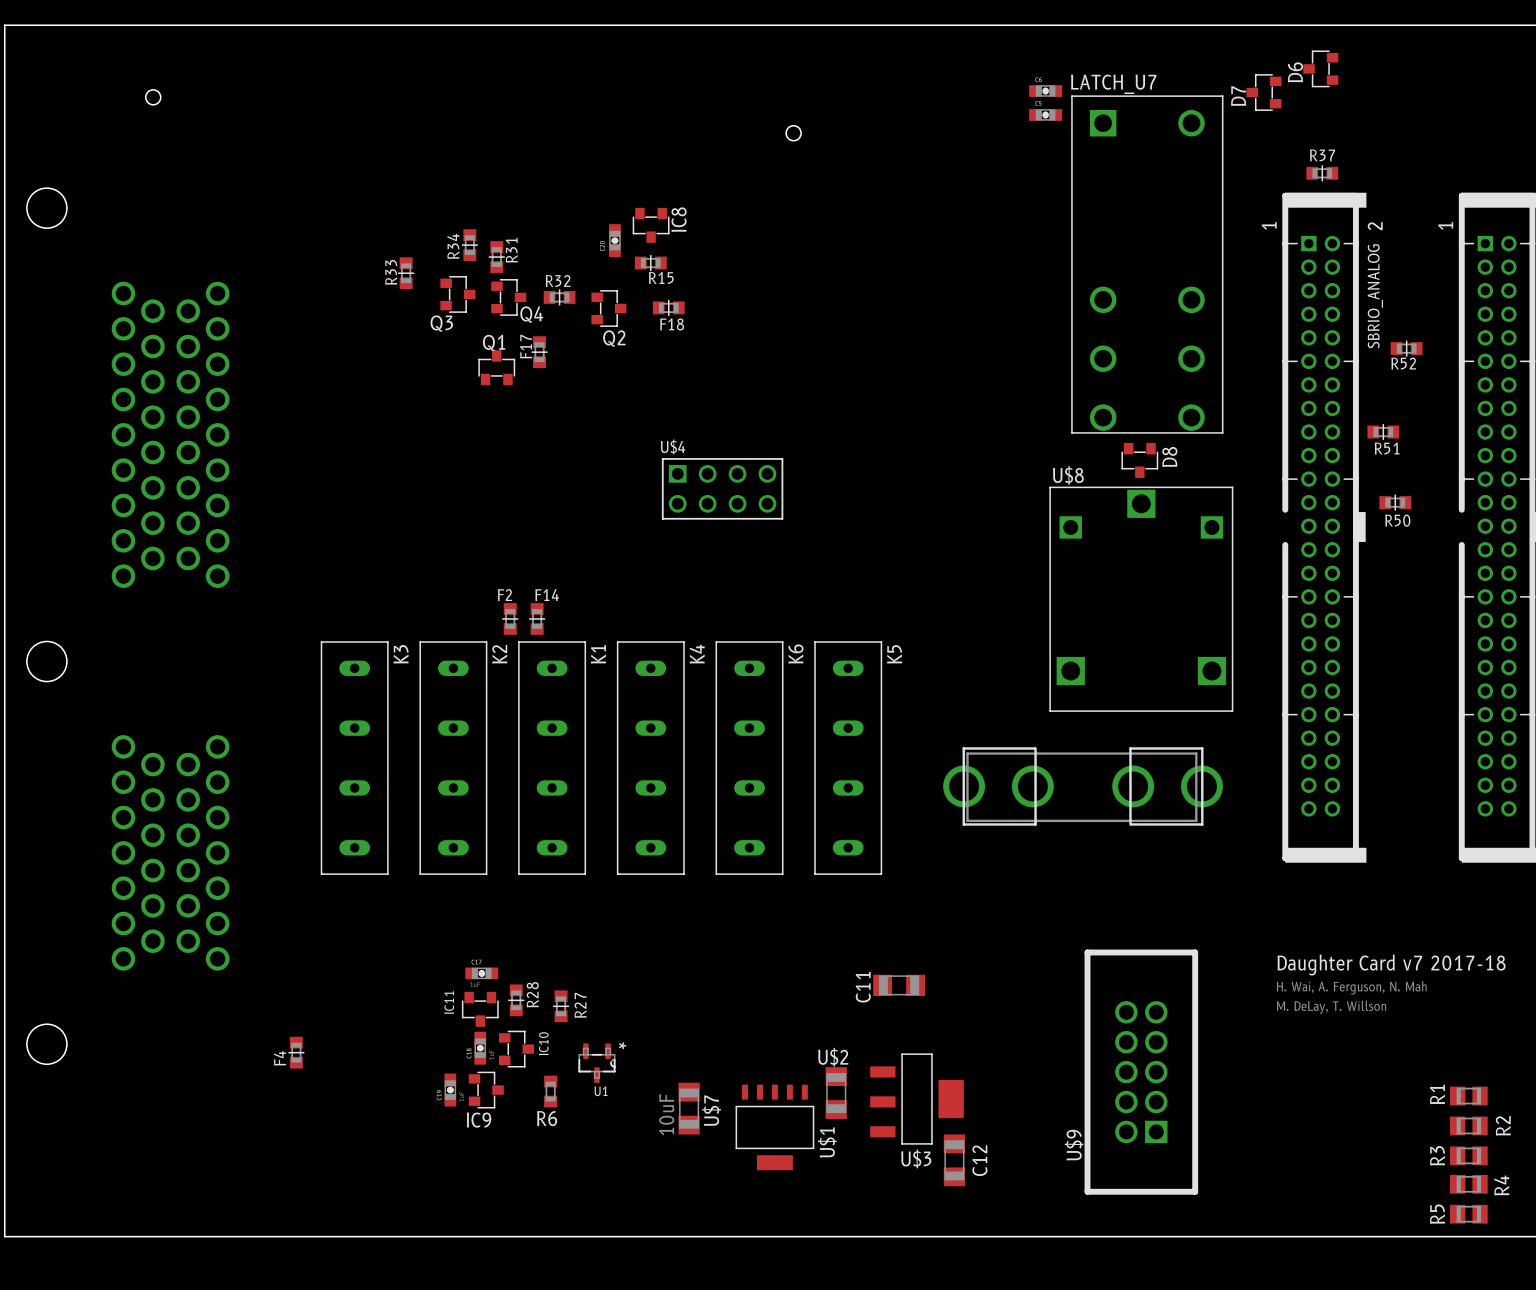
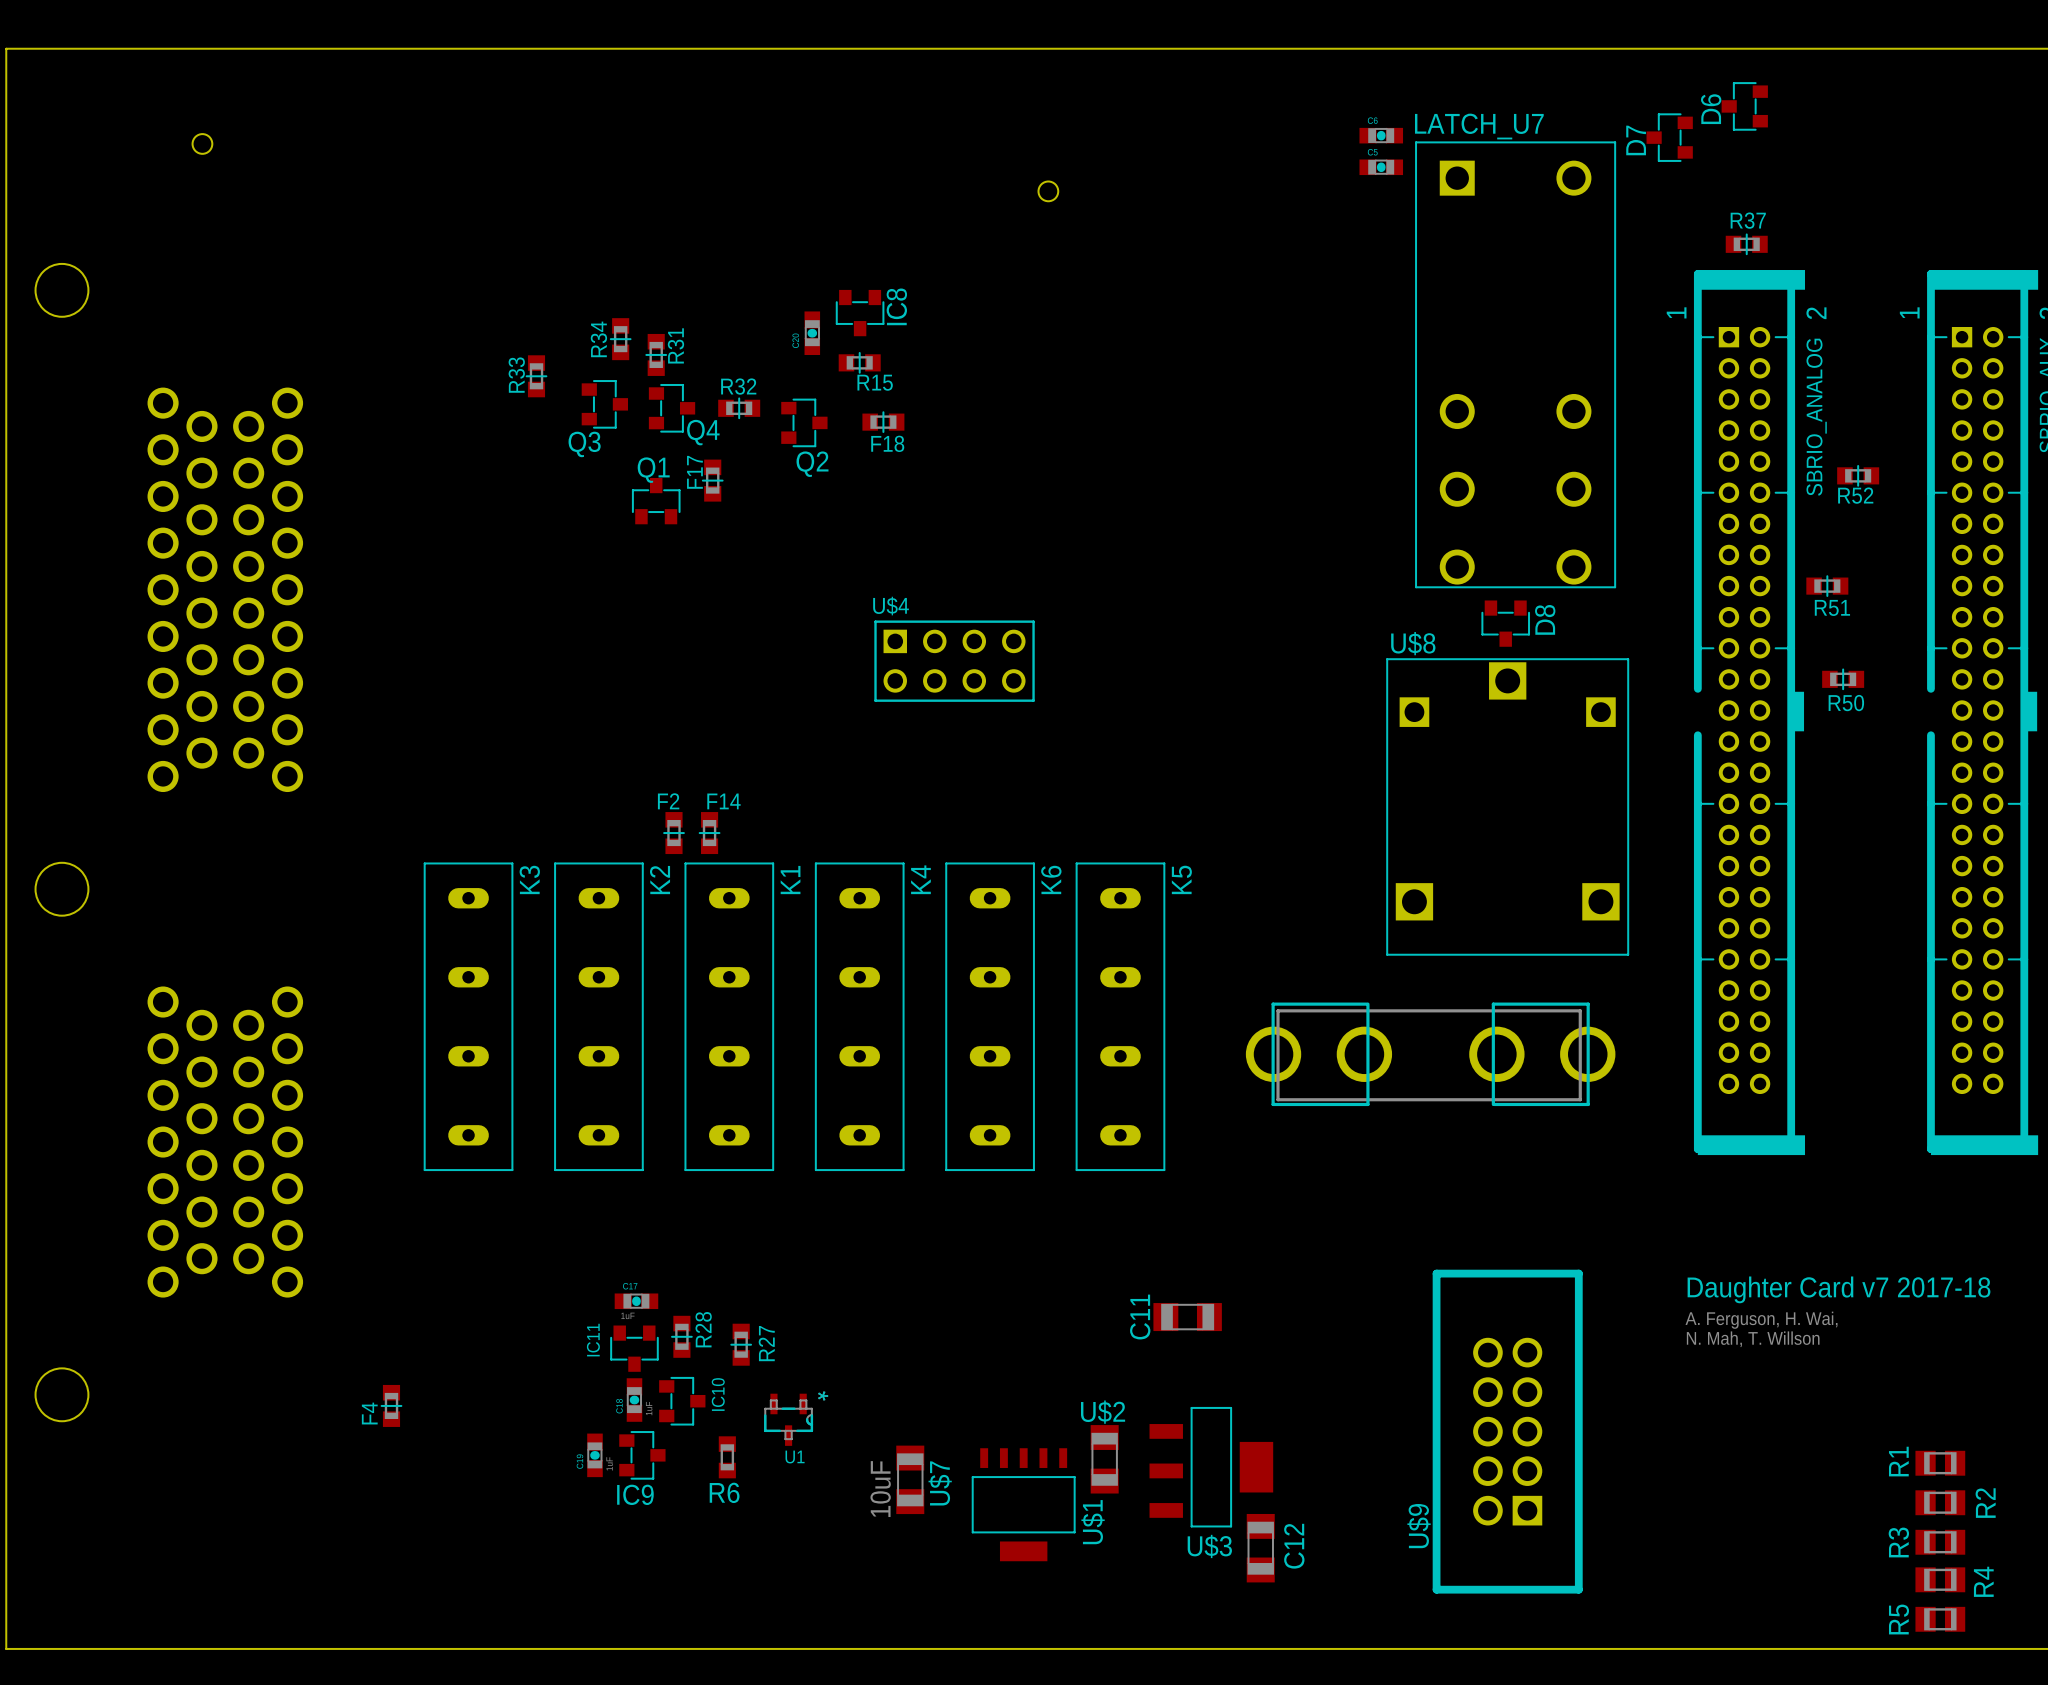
text: H. Wai, A. Ferguson, N. Mah (1351, 987) -> A. Ferguson, H. Wai, (1761, 1320)
text: M. DeLay, T. Willson (1331, 1007) -> N. Mah, T. Willson (1753, 1339)

